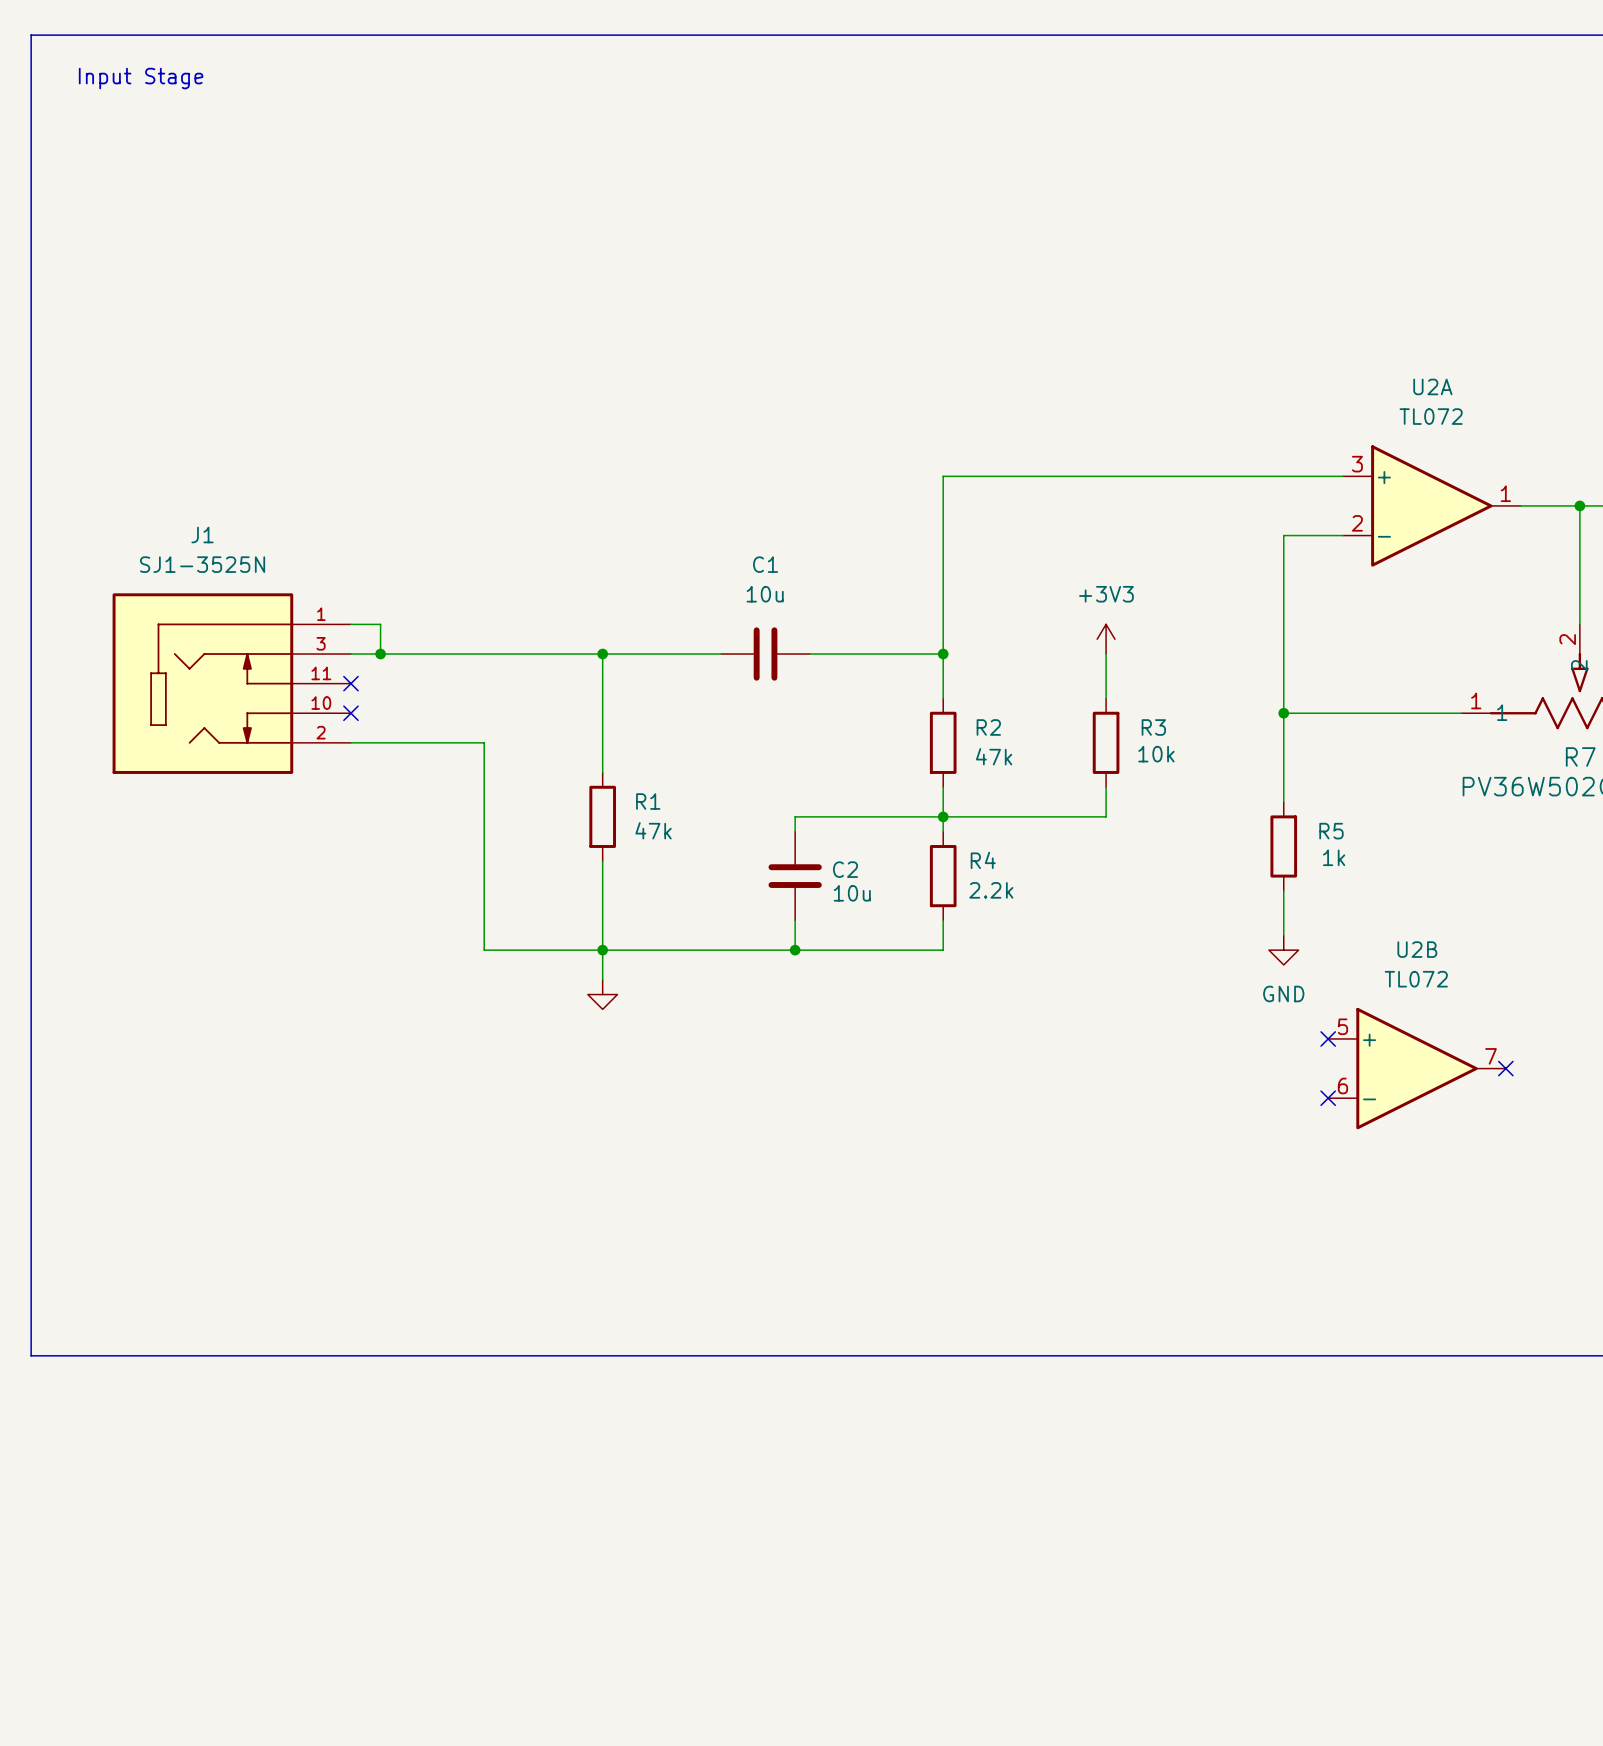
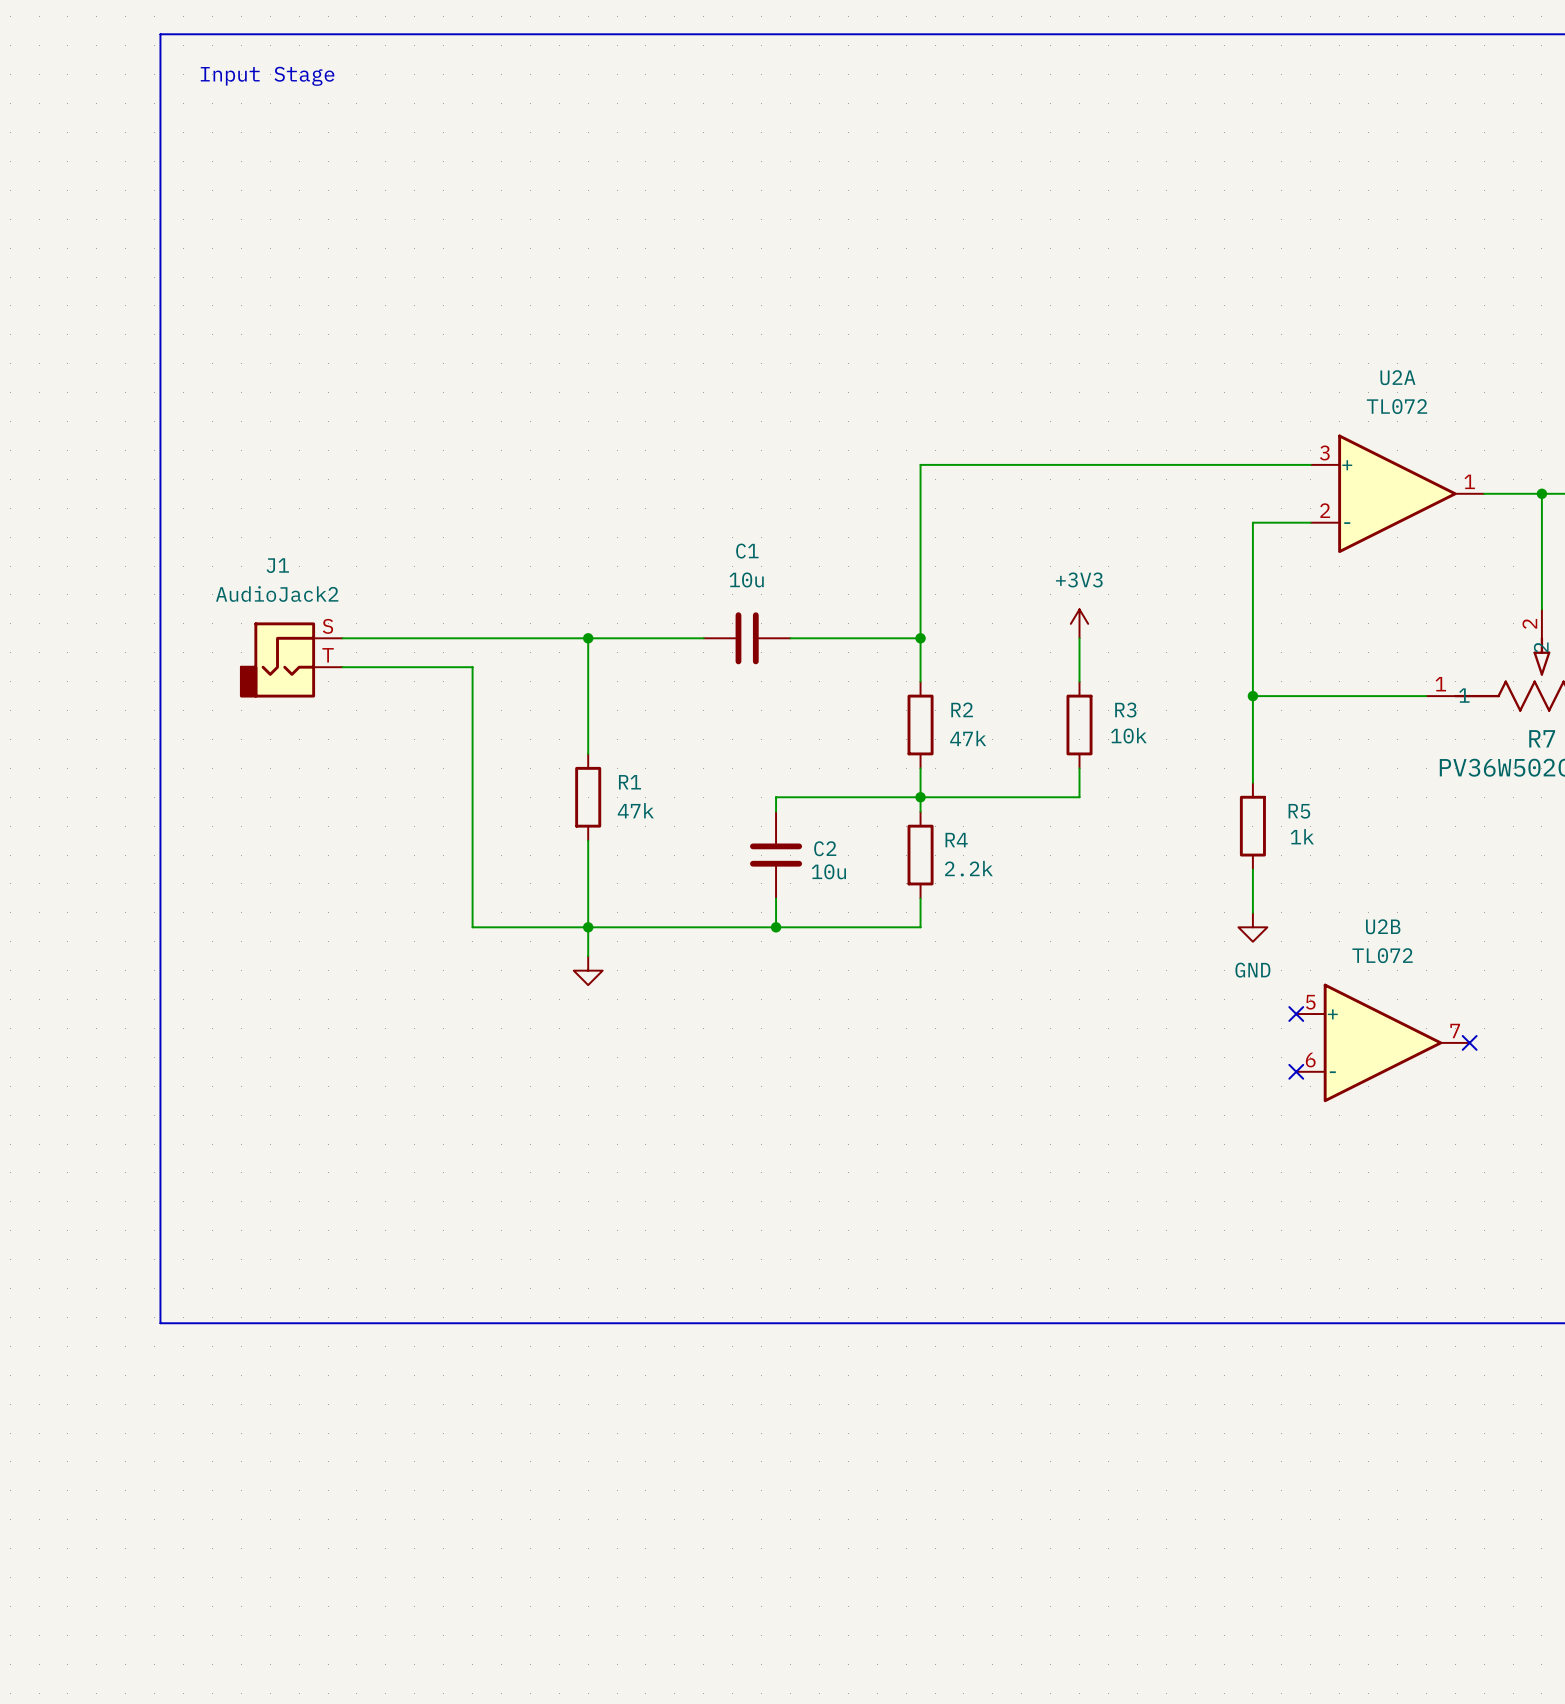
line: (164, 35) (31, 35) (31, 1355) (164, 1355) -> (160, 34) (160, 1323)
text position: Input Stage (141, 78) -> Input Stage (267, 76)
J1 name position: J1 (202, 535) -> J1 (277, 565)
J1 value: SJ1-3525N (202, 564) -> AudioJack2 (277, 594)
J1 symbol: [112, 593, 351, 774] -> [239, 622, 343, 698]
wire: (350, 624) (380, 624) (380, 654) -> none
junction: (380, 654) -> none
no-connect mark: (350, 683) -> none
no-connect mark: (350, 713) -> none
wire: (350, 742) (484, 742) -> (342, 667) (472, 667) (472, 725)

